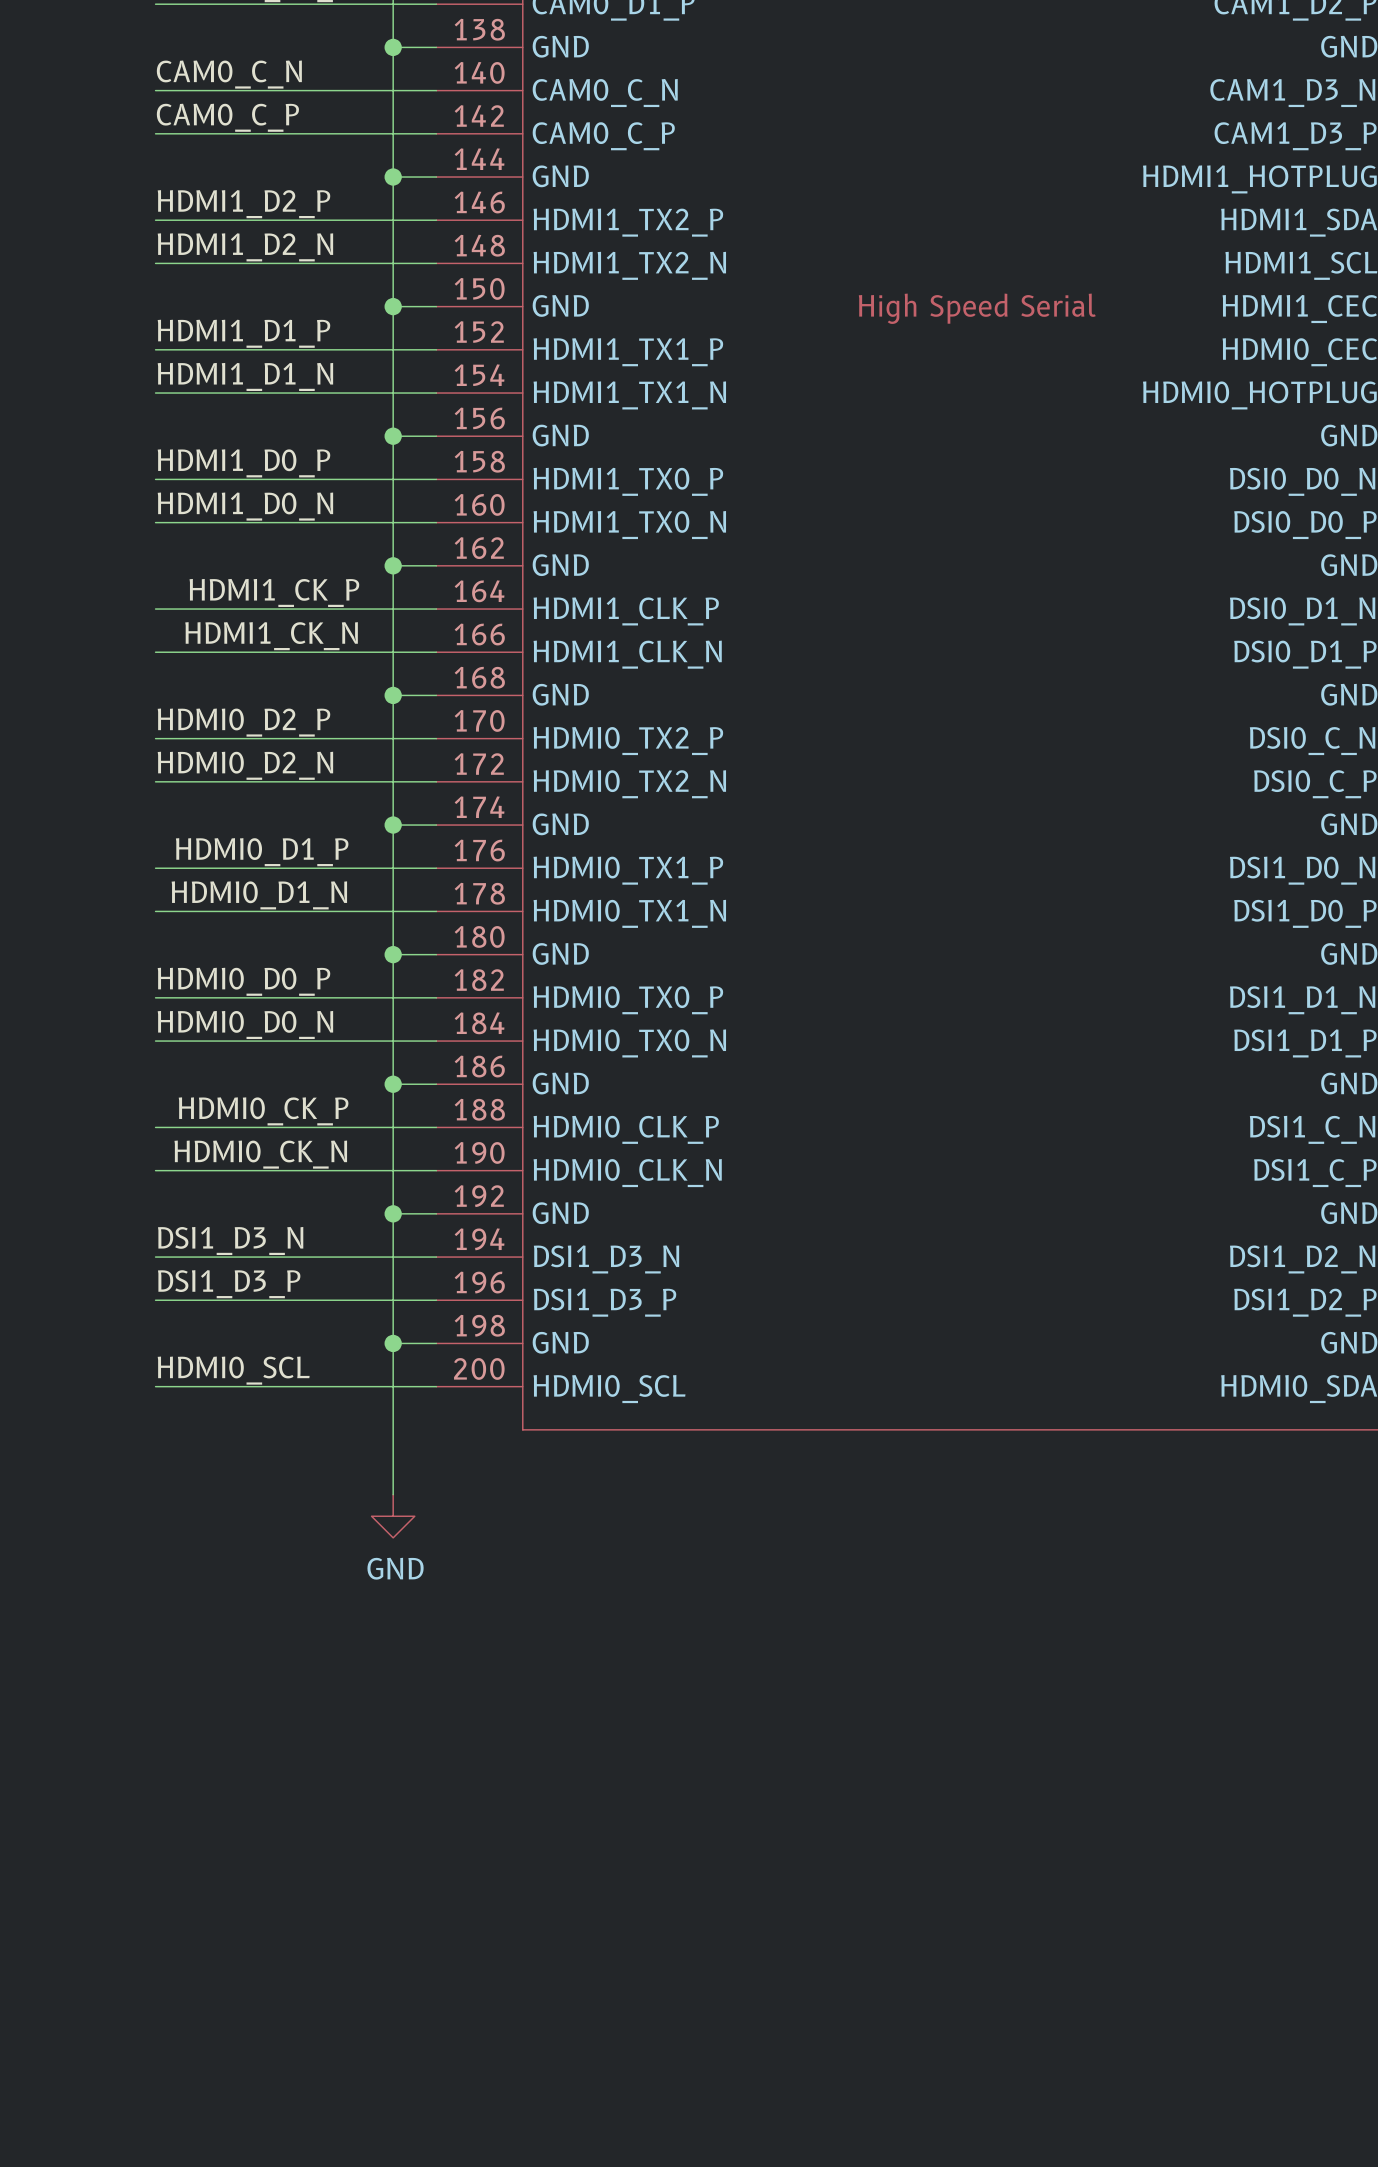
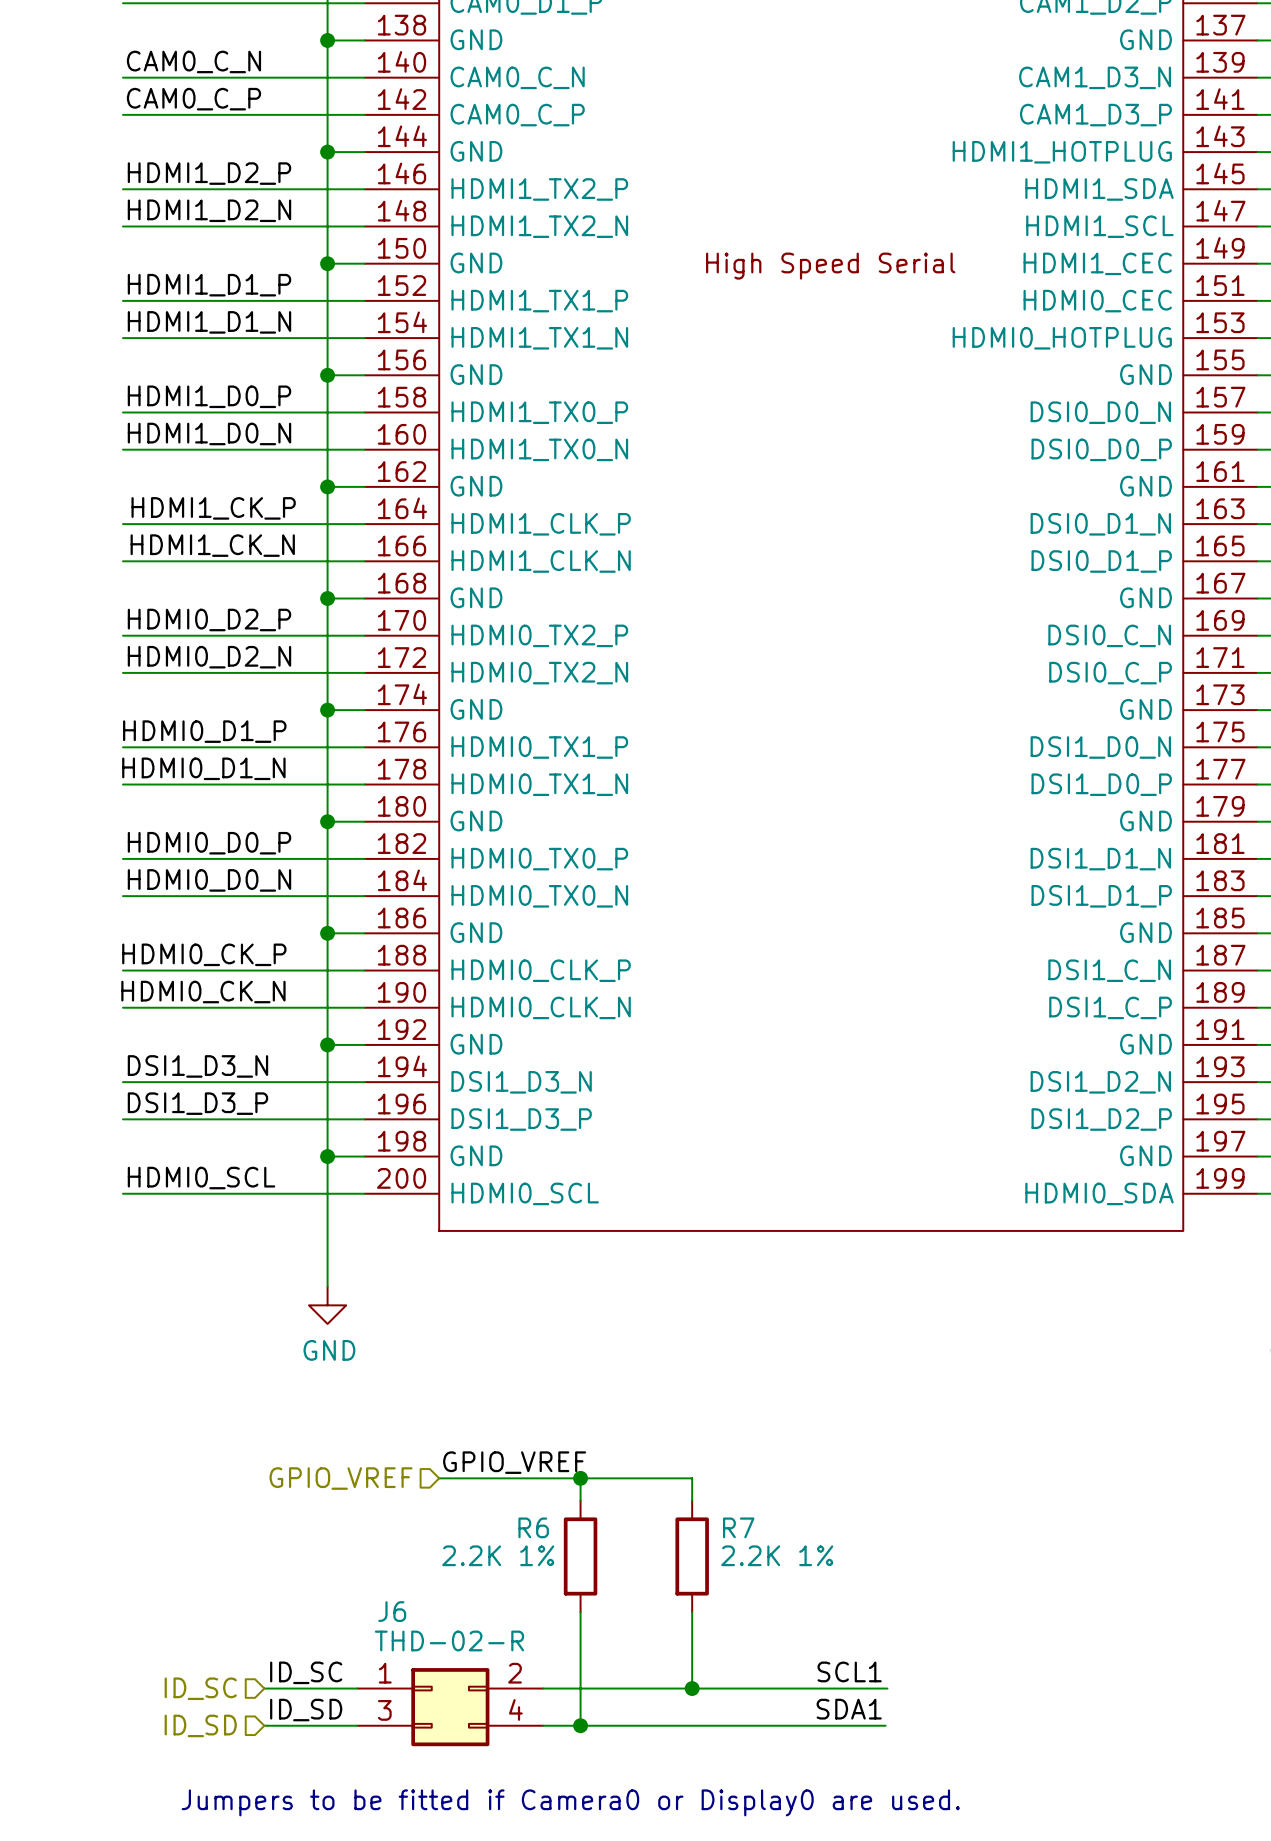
label: none -> GPIO_VREF (514, 1462)
wire: none -> (439, 1478) (692, 1478) (692, 1500)
wire: none -> (580, 1478) (580, 1500)
junction: none -> (580, 1478)
hierarchical label: none -> GPIO_VREF (341, 1478)
R6: none -> 2.2K 1% (580, 1556)
R7: none -> 2.2K 1% (692, 1556)
wire: none -> (580, 1612) (580, 1725)
wire: none -> (692, 1612) (692, 1688)
label: none -> SCL1 (849, 1671)
label: none -> ID_SC (306, 1672)
wire: none -> (264, 1688) (357, 1688)
wire: none -> (543, 1688) (887, 1688)
junction: none -> (692, 1688)
hierarchical label: none -> ID_SC (200, 1688)
J6: none -> THD-02-R (450, 1707)
label: none -> SDA1 (849, 1709)
label: none -> ID_SD (306, 1710)
wire: none -> (264, 1725) (357, 1725)
wire: none -> (543, 1725) (885, 1725)
junction: none -> (580, 1725)
hierarchical label: none -> ID_SD (200, 1725)
text: none -> Jumpers to be fitted if Camera0 or Display0 are used. (570, 1802)

